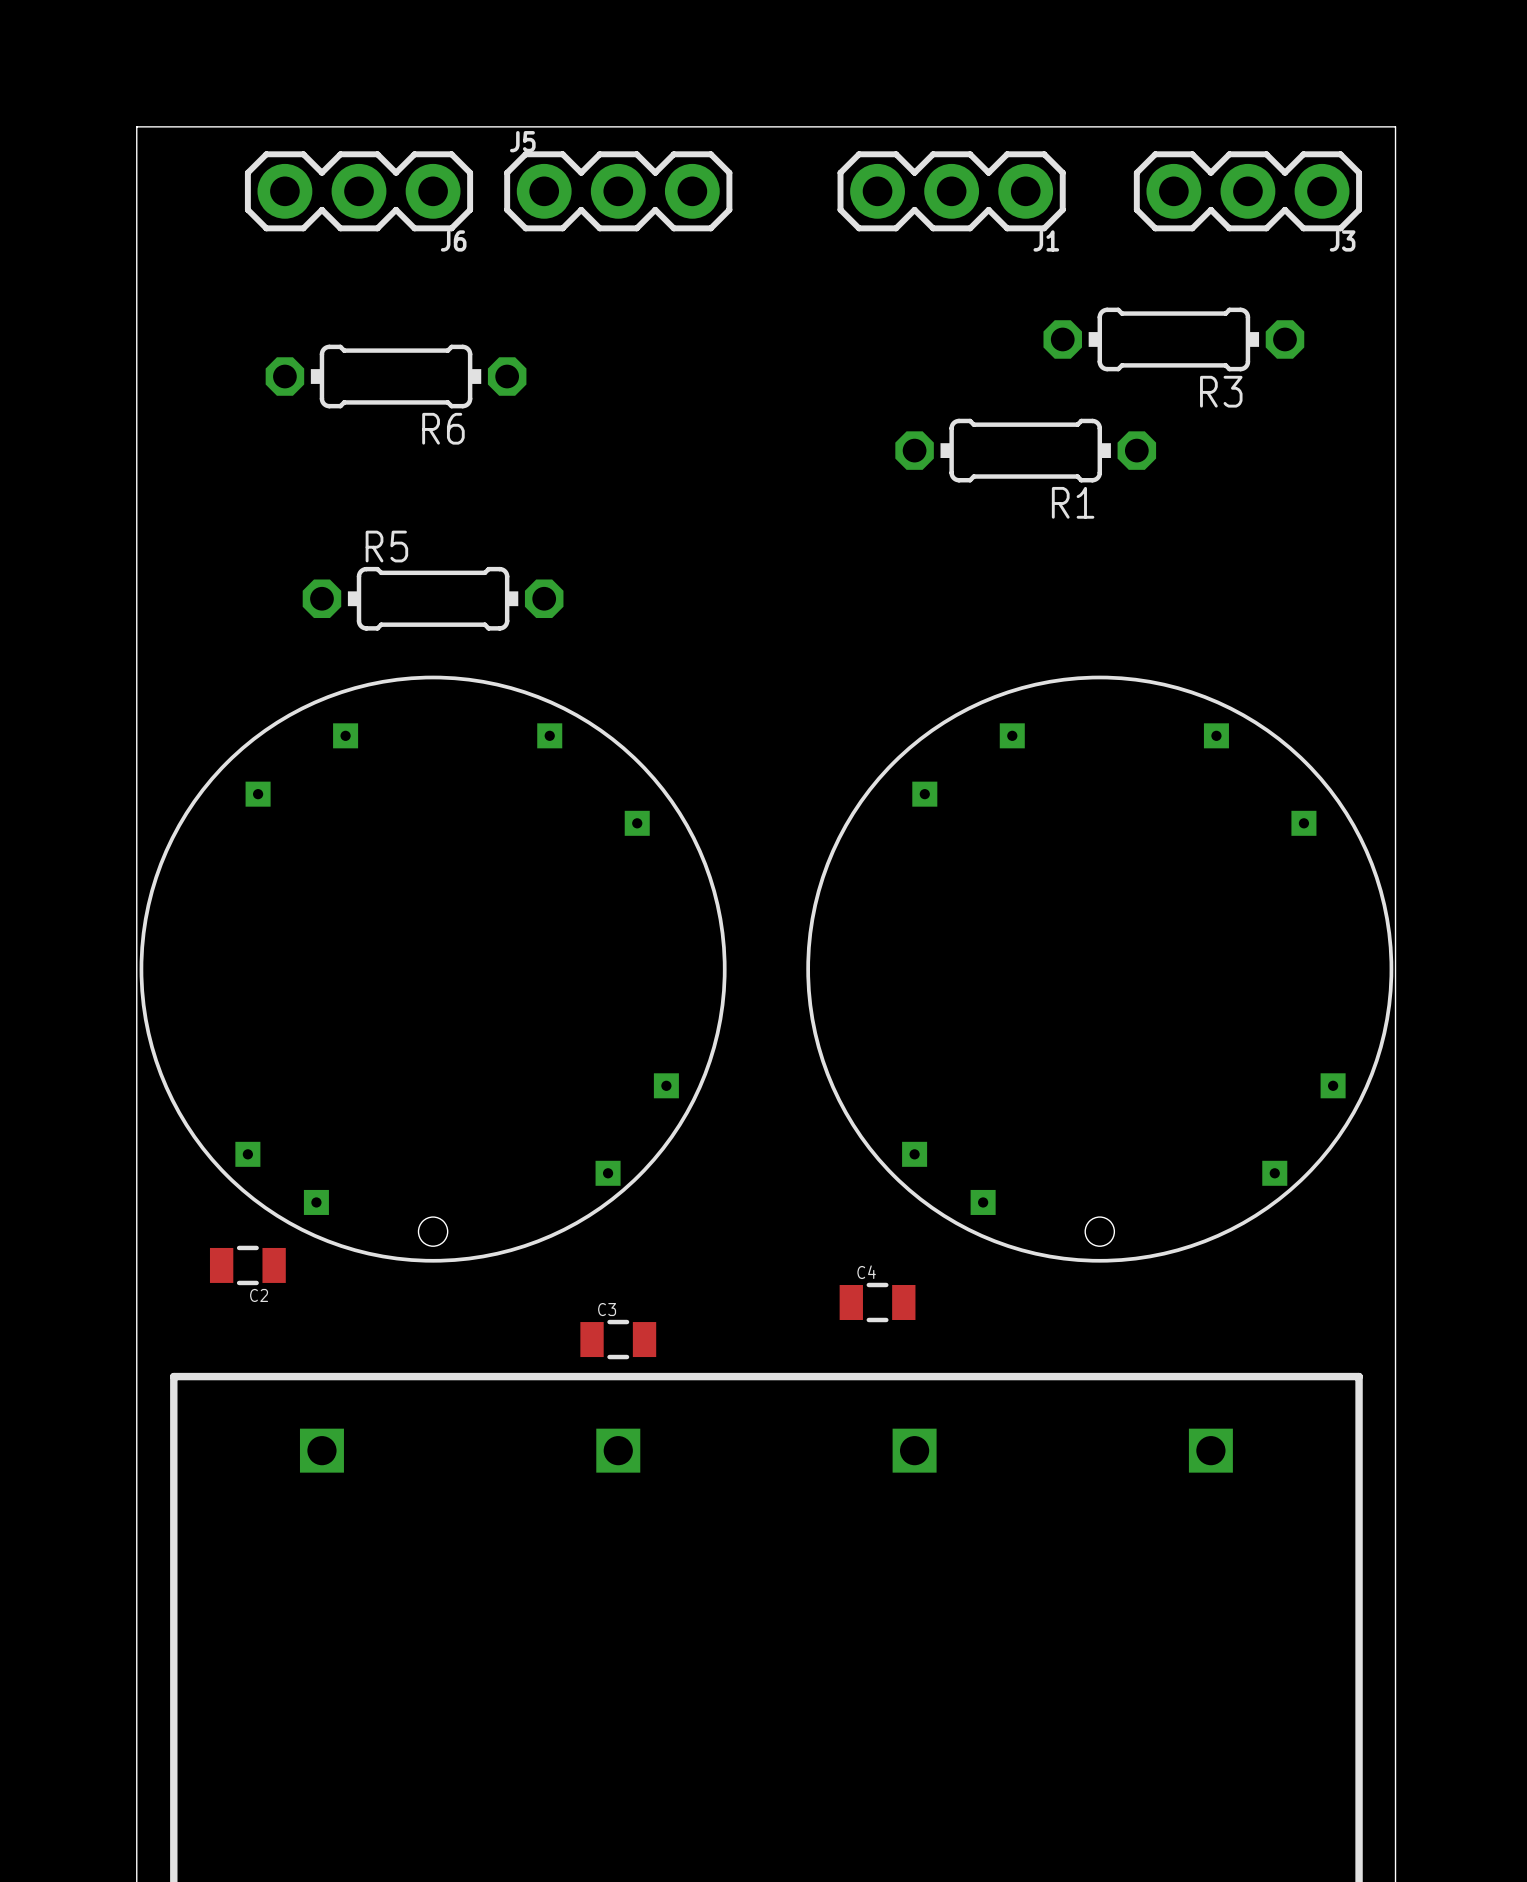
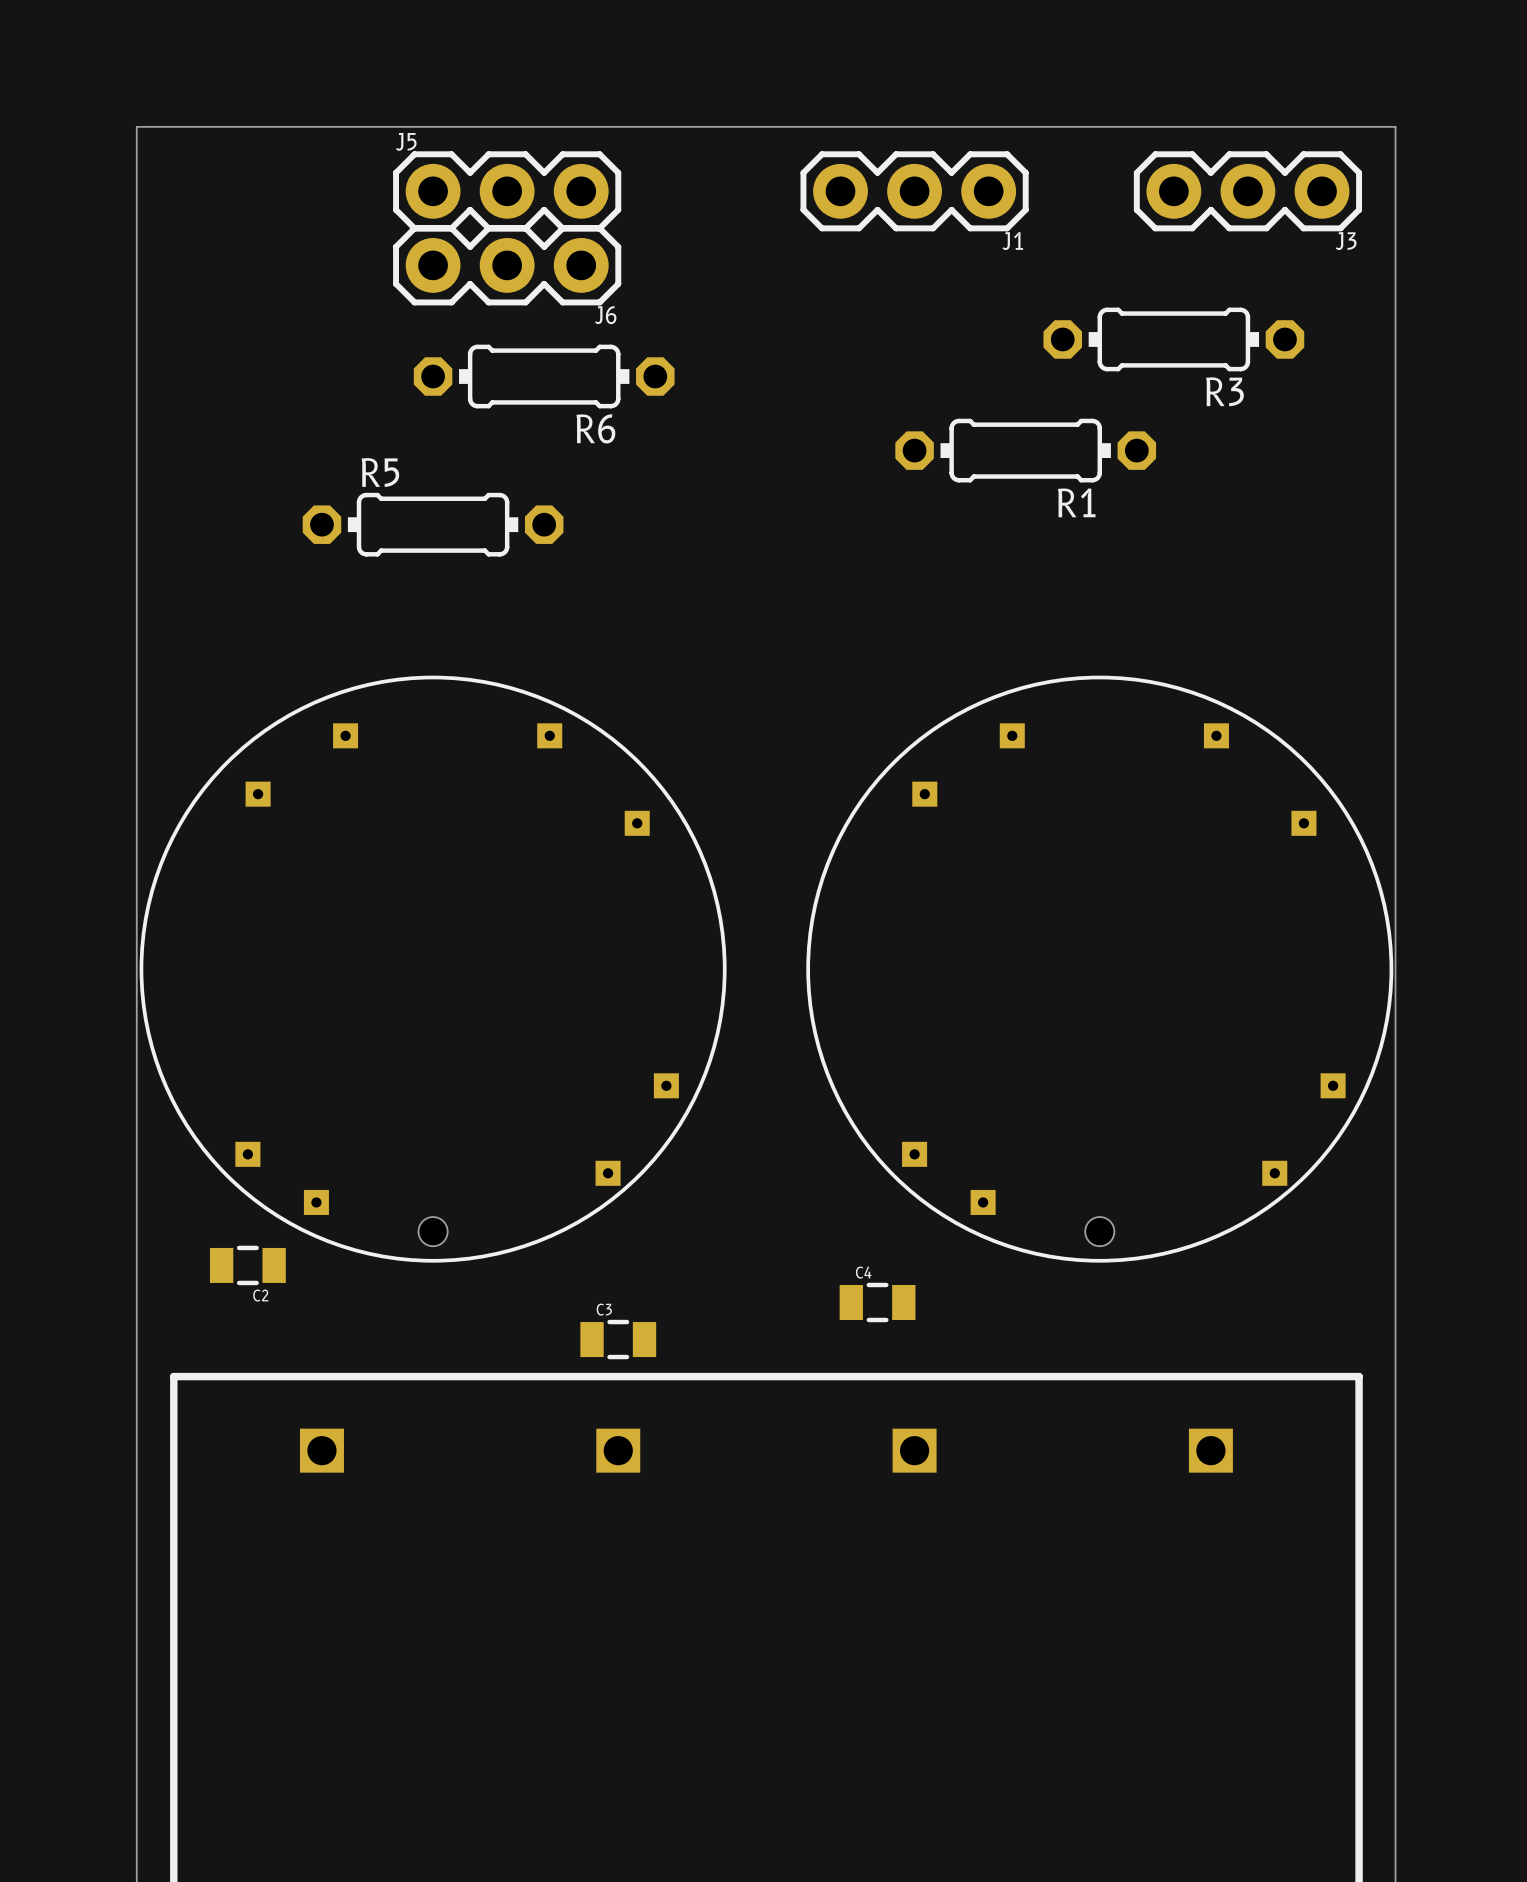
J6 position: (359, 191) -> (507, 265)
J5 position: (618, 191) -> (507, 191)
J1 position: (951, 191) -> (914, 191)
R6 position: (396, 376) -> (544, 376)
R5 position: (433, 598) -> (433, 524)

